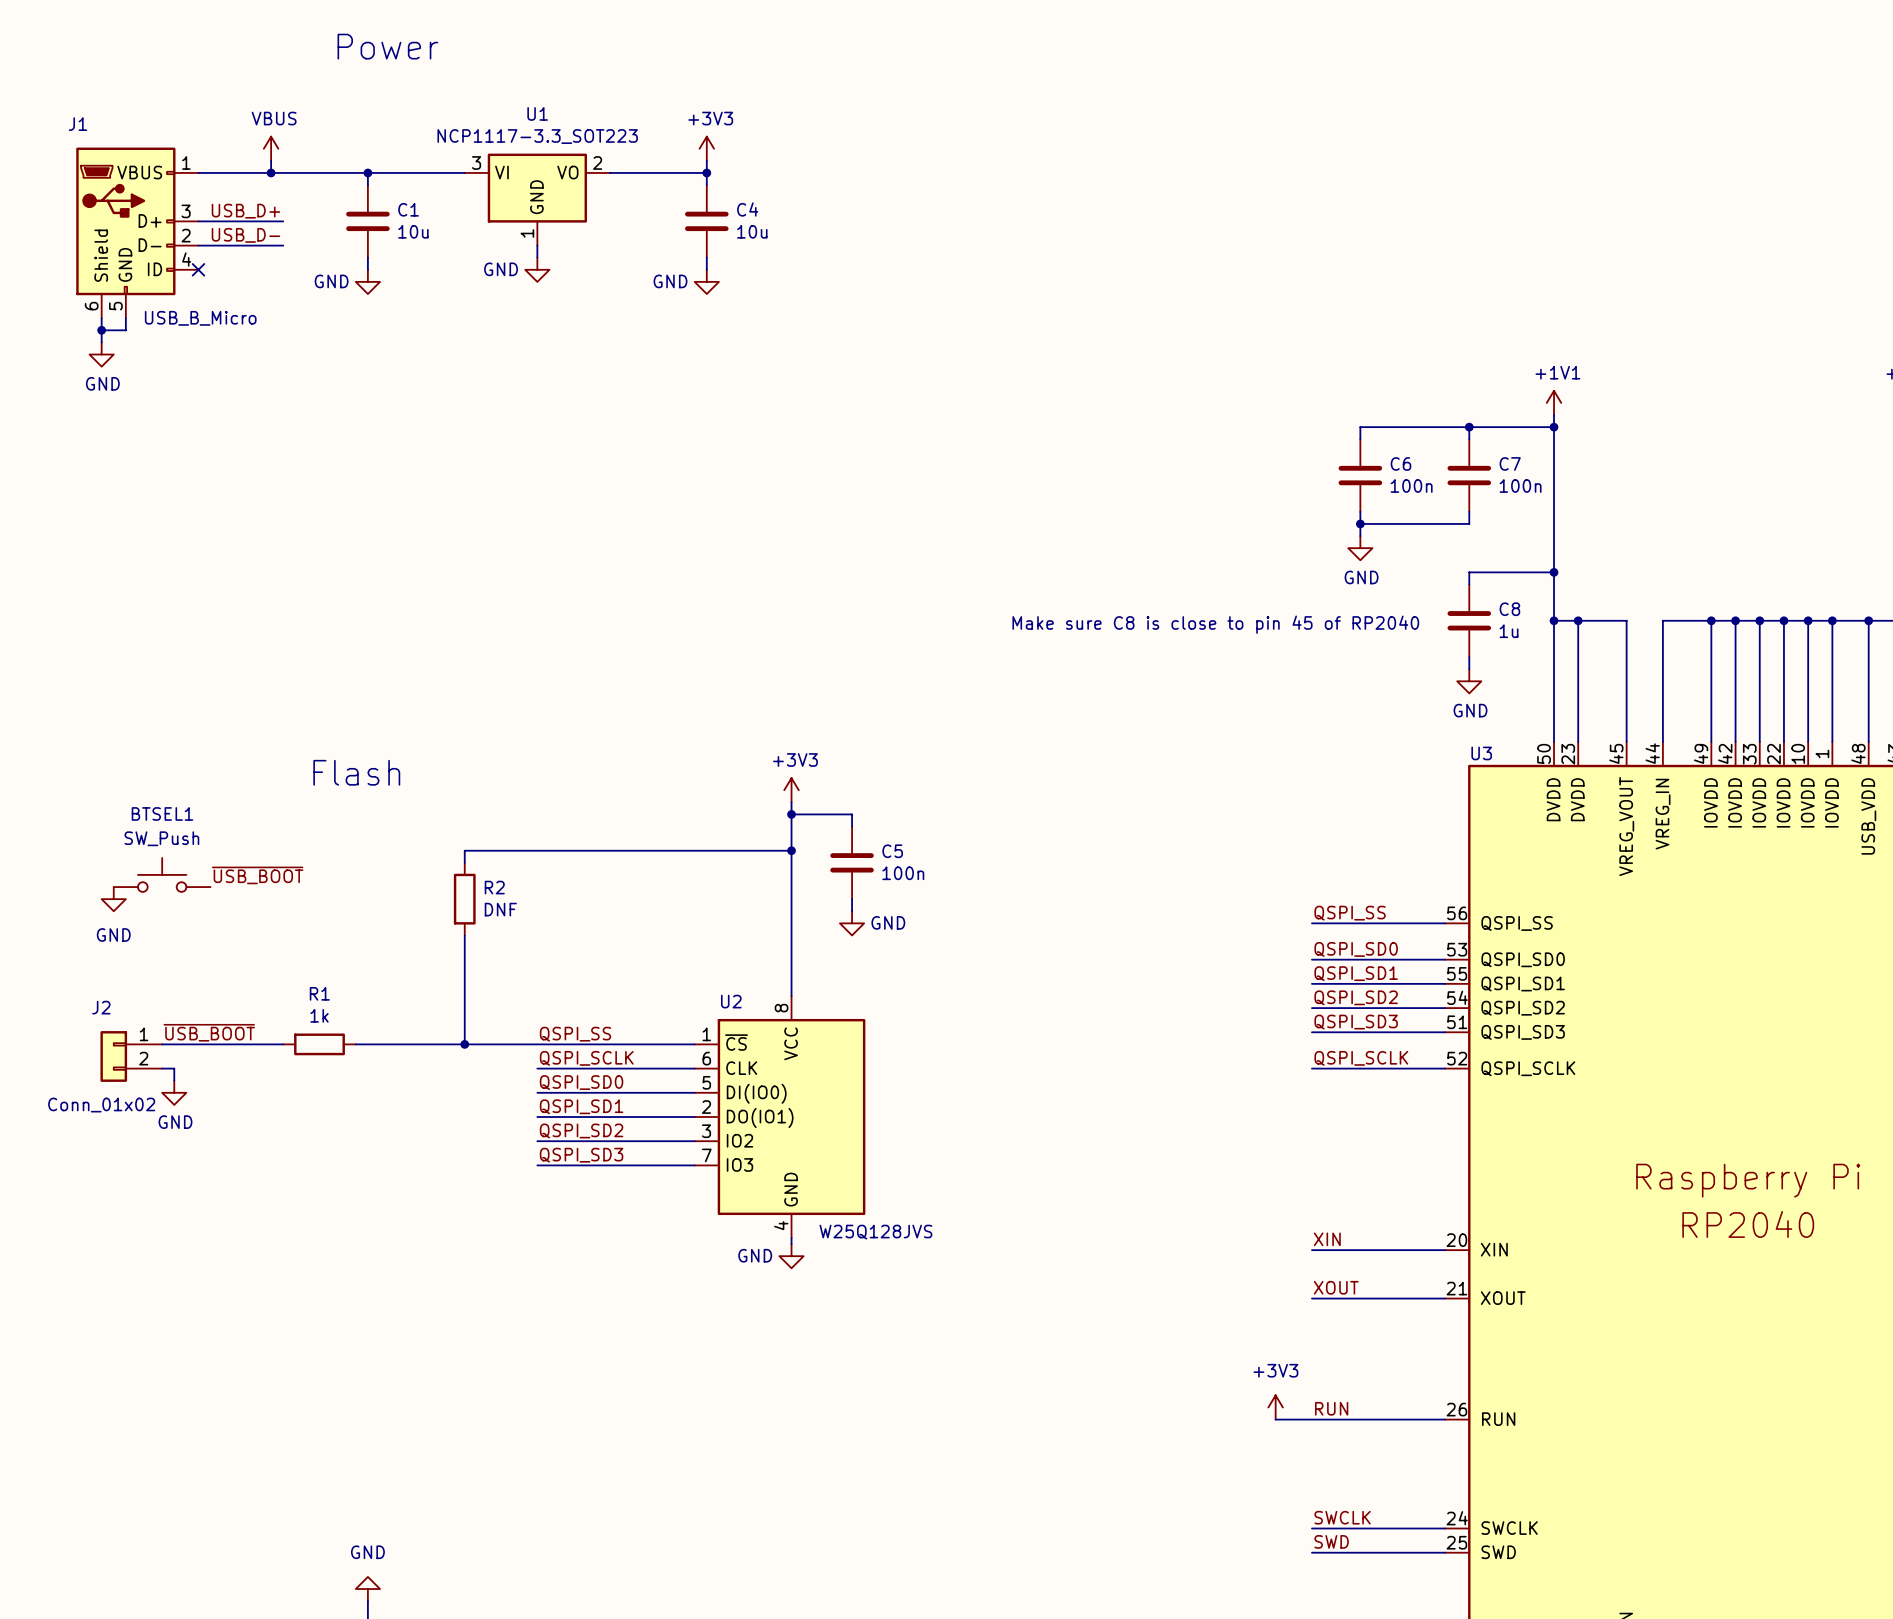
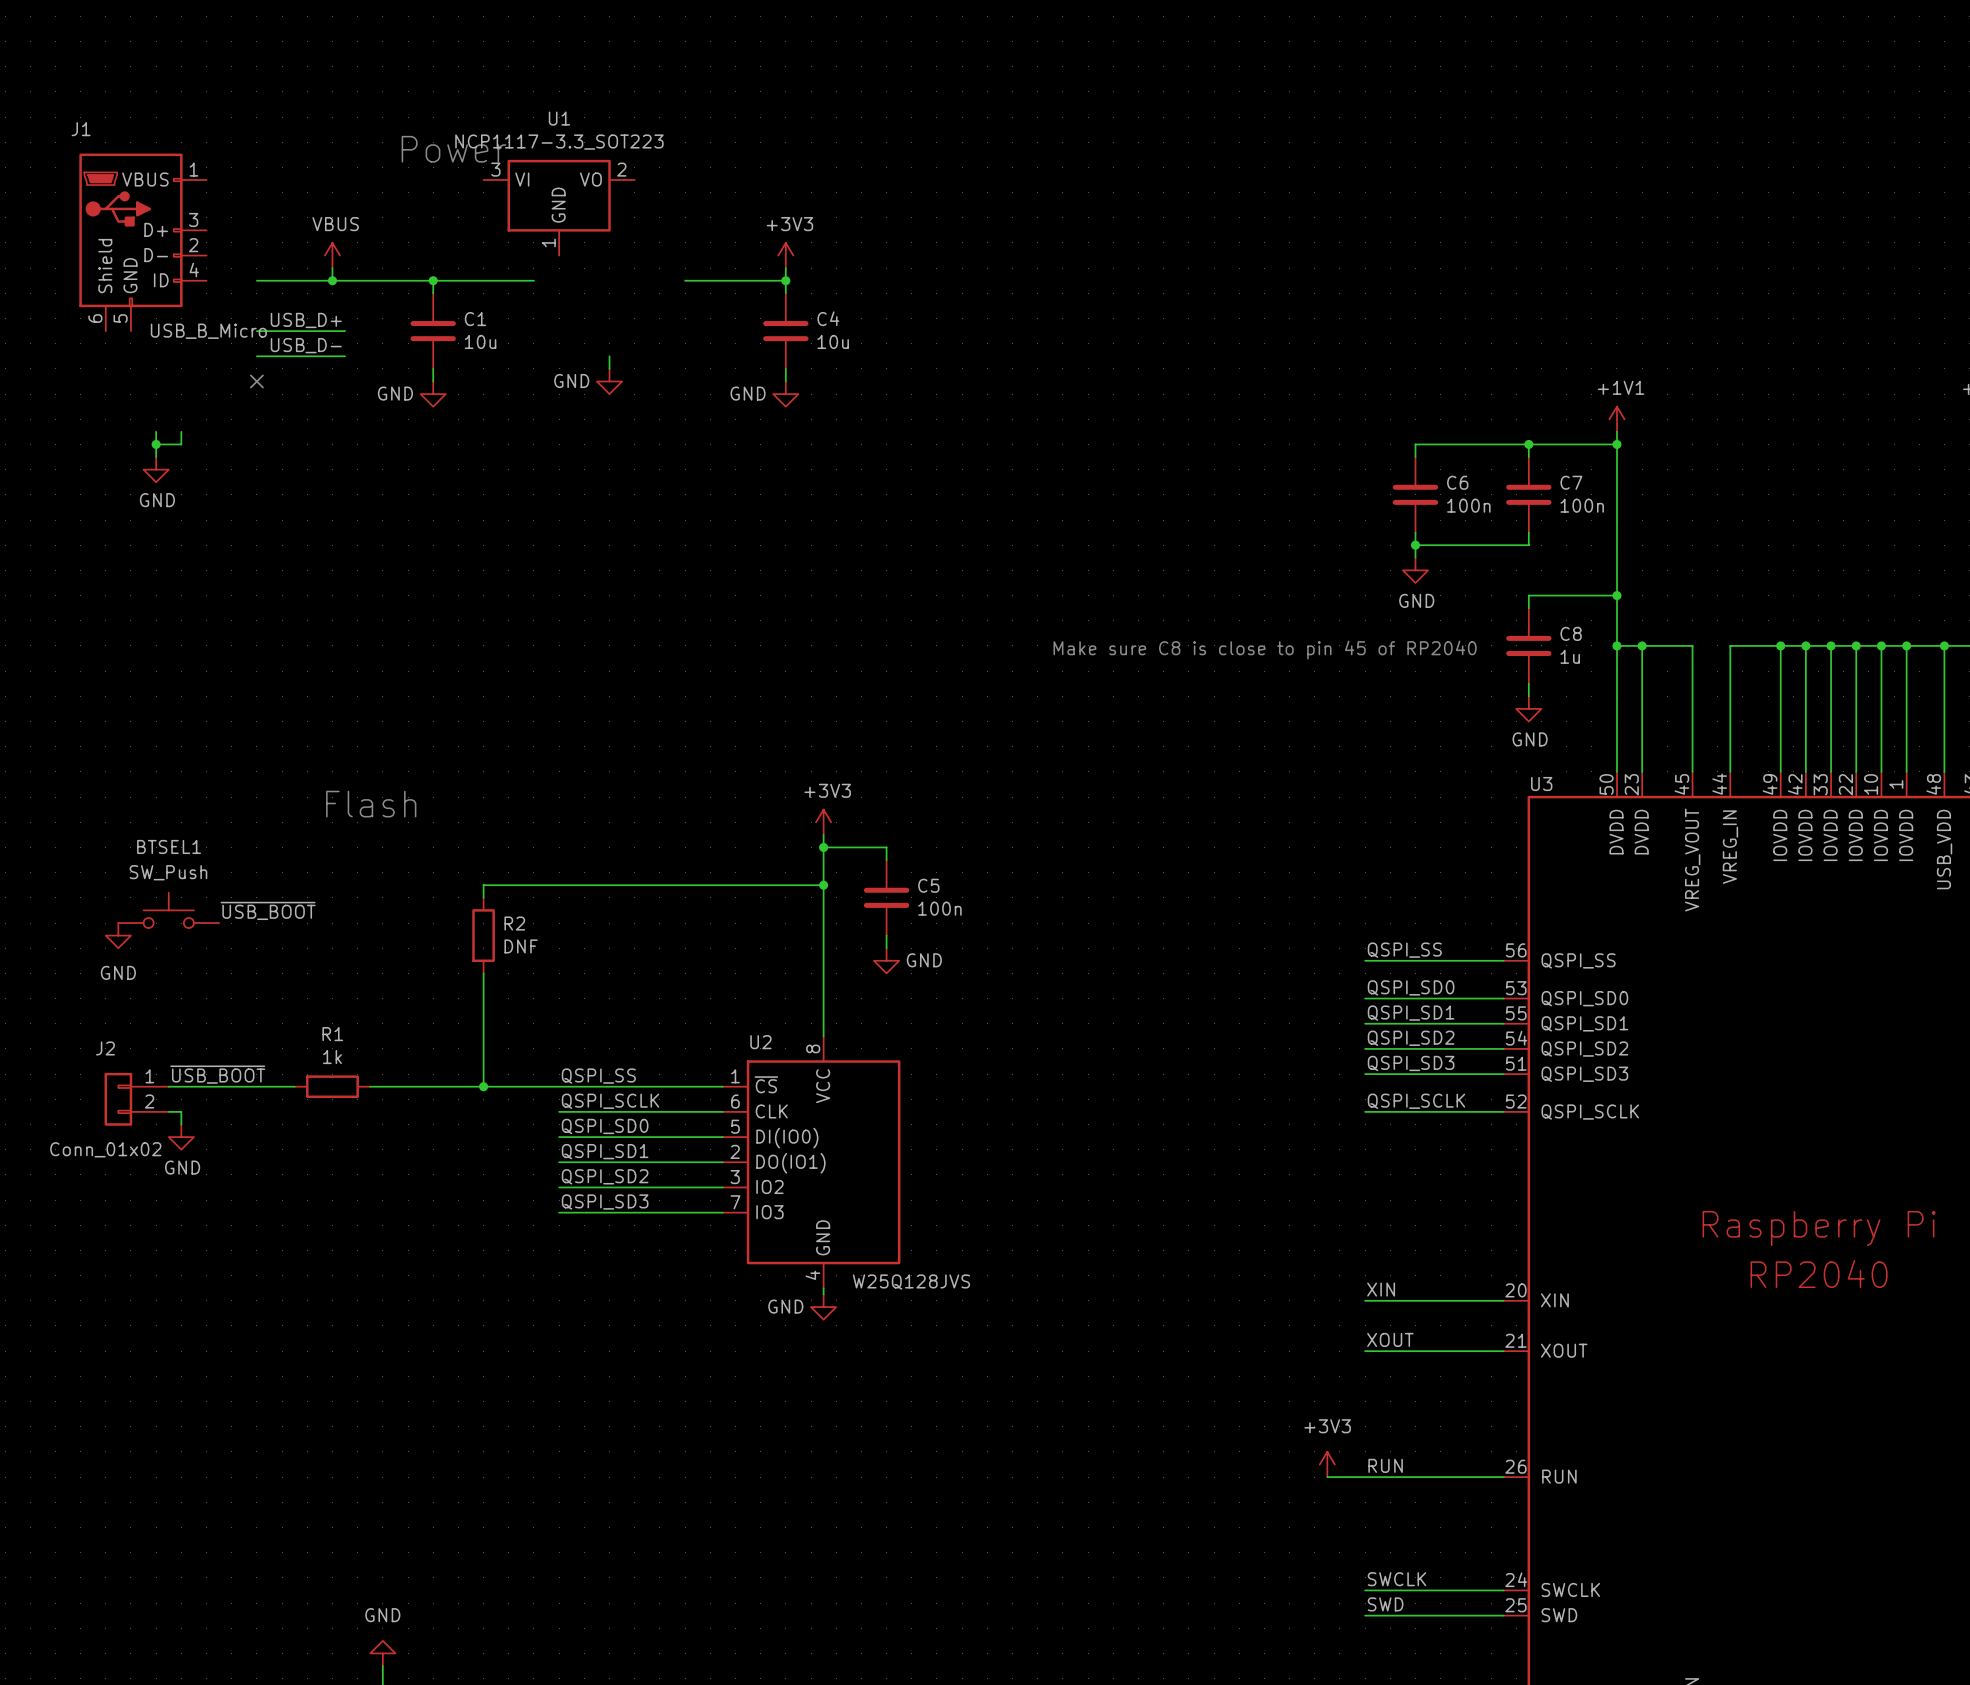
text position: Power (387, 46) -> Power (453, 149)
power symbol position: VBUS (271, 148) -> VBUS (332, 255)
power symbol position: +3V3 (706, 148) -> +3V3 (785, 255)
wire: (271, 160) (271, 172) -> (332, 268) (332, 280)
wire: (706, 160) (706, 185) -> (785, 268) (785, 293)
wire: (198, 172) (464, 172) -> (256, 280) (533, 280)
junction: (271, 172) -> none
wire: (367, 172) (367, 185) -> (433, 280) (433, 293)
junction: (367, 172) -> none
wire: (609, 172) (706, 172) -> (685, 280) (785, 280)
junction: (706, 172) -> none
label position: USB_D+ (245, 211) -> USB_D+ (306, 320)
wire: (198, 221) (283, 221) -> (256, 331) (345, 331)
C1 position: (367, 221) -> (433, 331)
C4 position: (706, 221) -> (785, 331)
label position: USB_D- (245, 235) -> USB_D- (306, 345)
wire: (198, 245) (283, 245) -> (256, 356) (345, 356)
wire: (537, 245) (537, 257) -> (609, 356) (609, 368)
wire: (367, 257) (367, 269) -> (433, 368) (433, 381)
wire: (706, 257) (706, 269) -> (785, 368) (785, 381)
no-connect mark: (198, 269) -> none
junction: none -> (332, 280)
junction: none -> (433, 280)
power symbol: GND (537, 269) -> none
junction: none -> (785, 280)
power symbol: GND (367, 281) -> none
power symbol: GND (706, 281) -> none
wire: (101, 318) (101, 342) -> (156, 431) (156, 457)
wire: (125, 318) (125, 330) (101, 330) -> (181, 431) (181, 444) (156, 444)
junction: (101, 330) -> none
power symbol position: GND (101, 354) -> GND (156, 469)
no-connect mark: none -> (256, 381)
power symbol: none -> GND (609, 381)
power symbol: none -> GND (433, 394)
power symbol: none -> GND (785, 394)
junction: none -> (156, 444)

